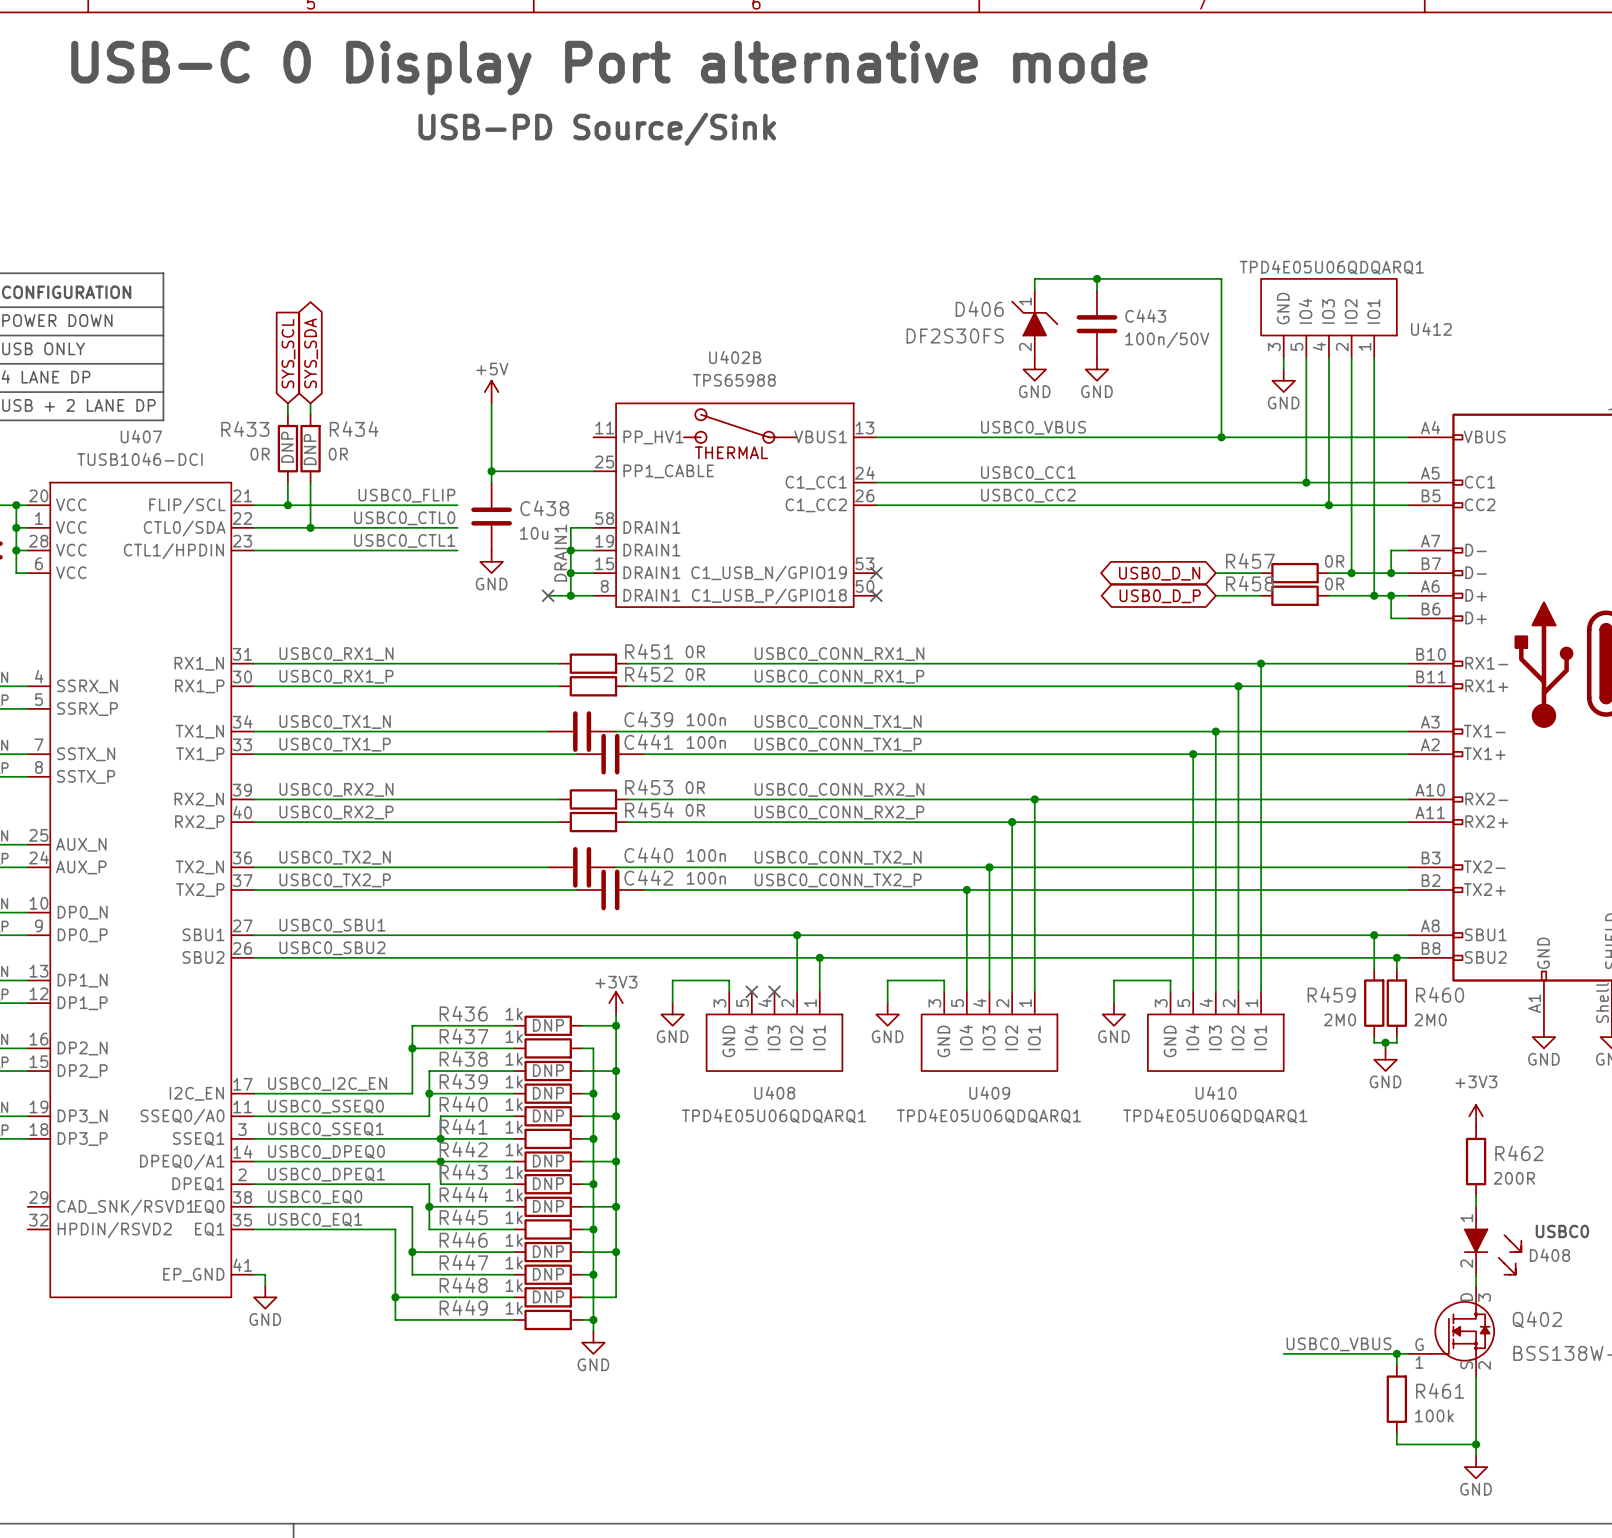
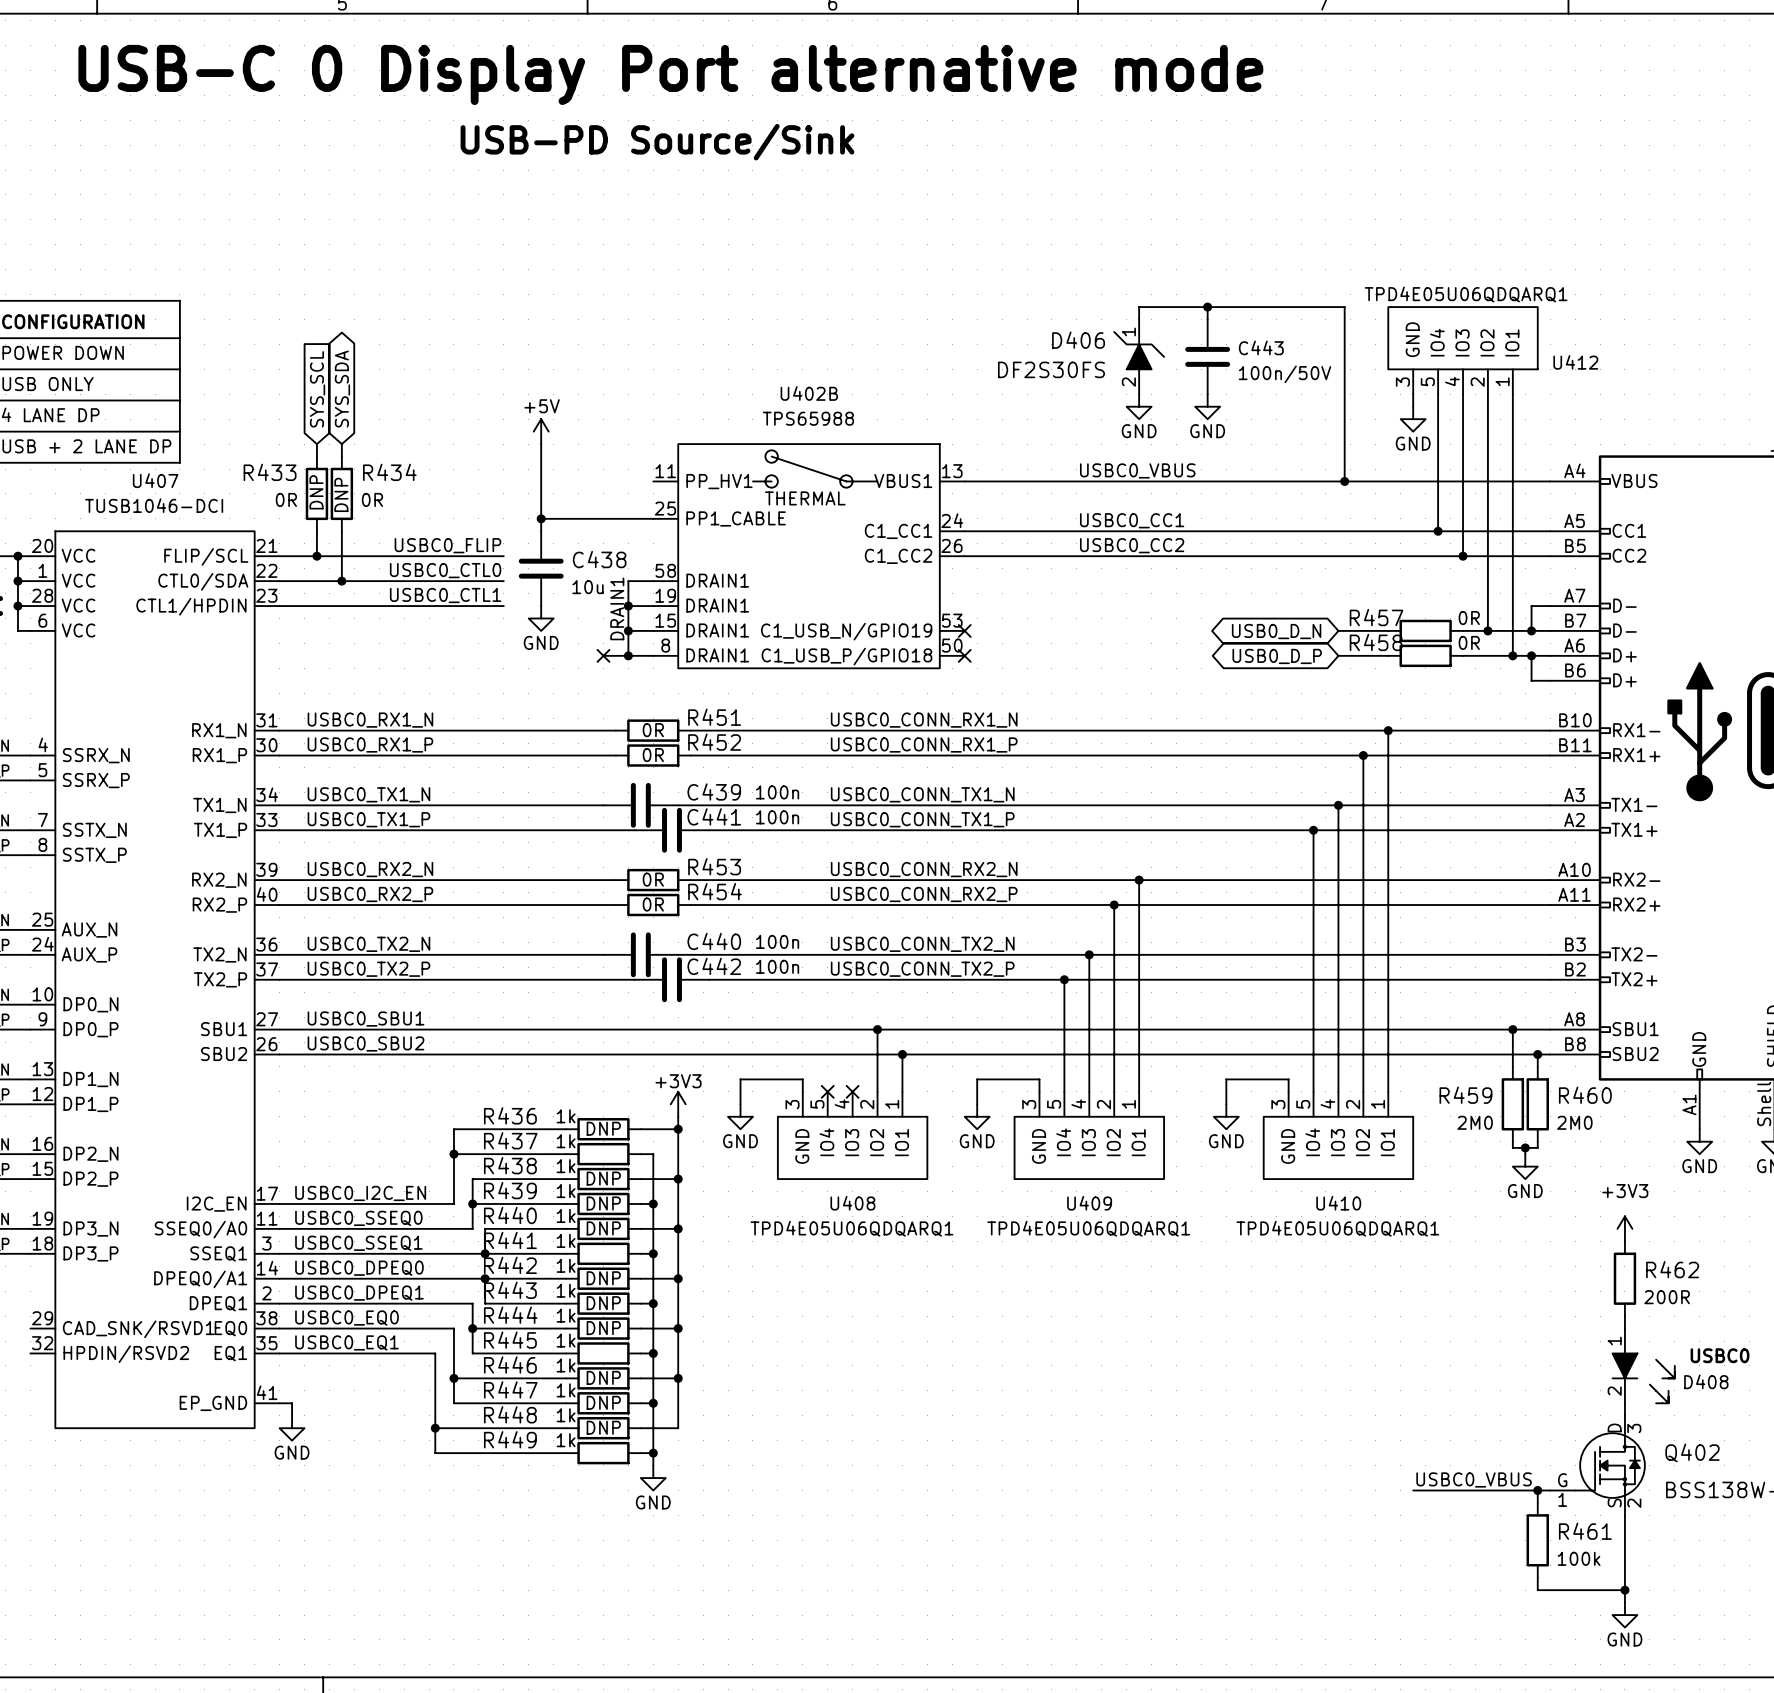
R451 text position: 0R (695, 651) -> 0R (653, 730)
R452 text position: 0R (695, 674) -> 0R (653, 755)
R453 text position: 0R (695, 787) -> 0R (653, 879)
R454 text position: 0R (695, 810) -> 0R (653, 904)

